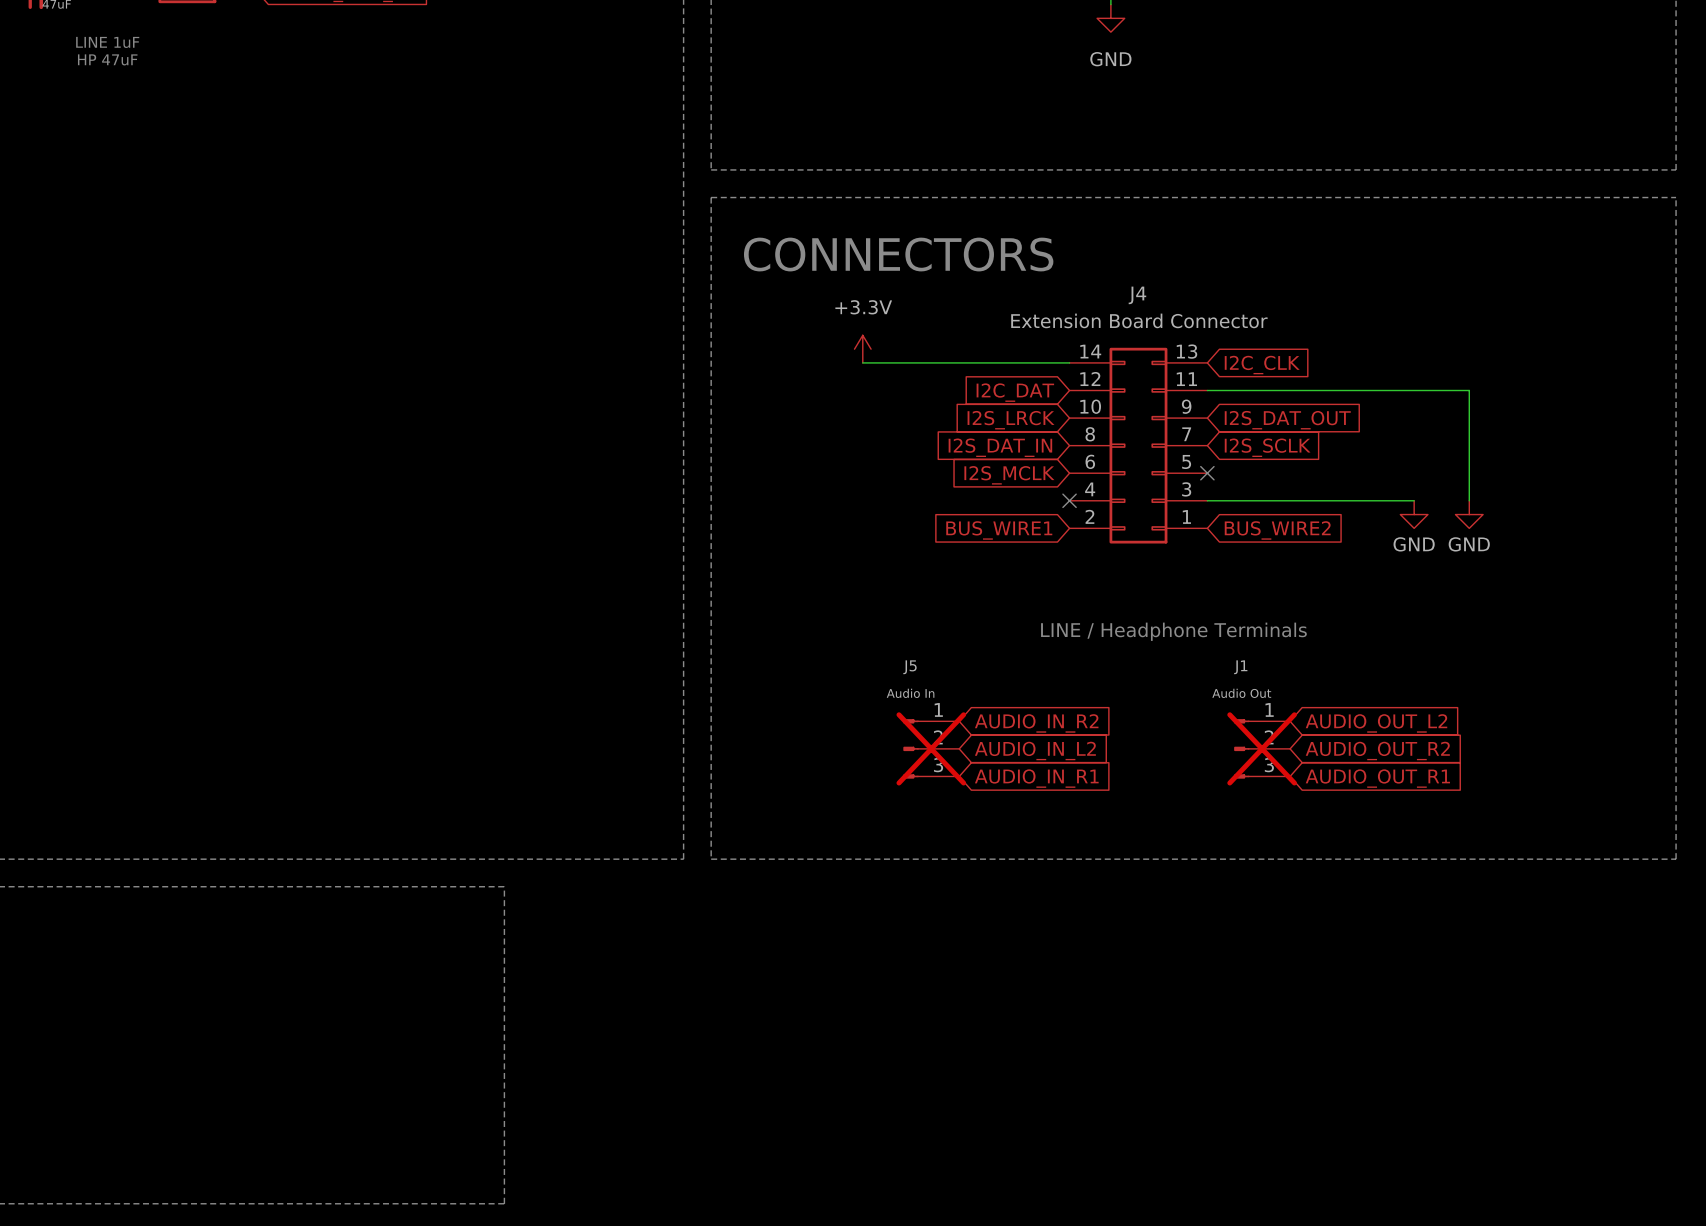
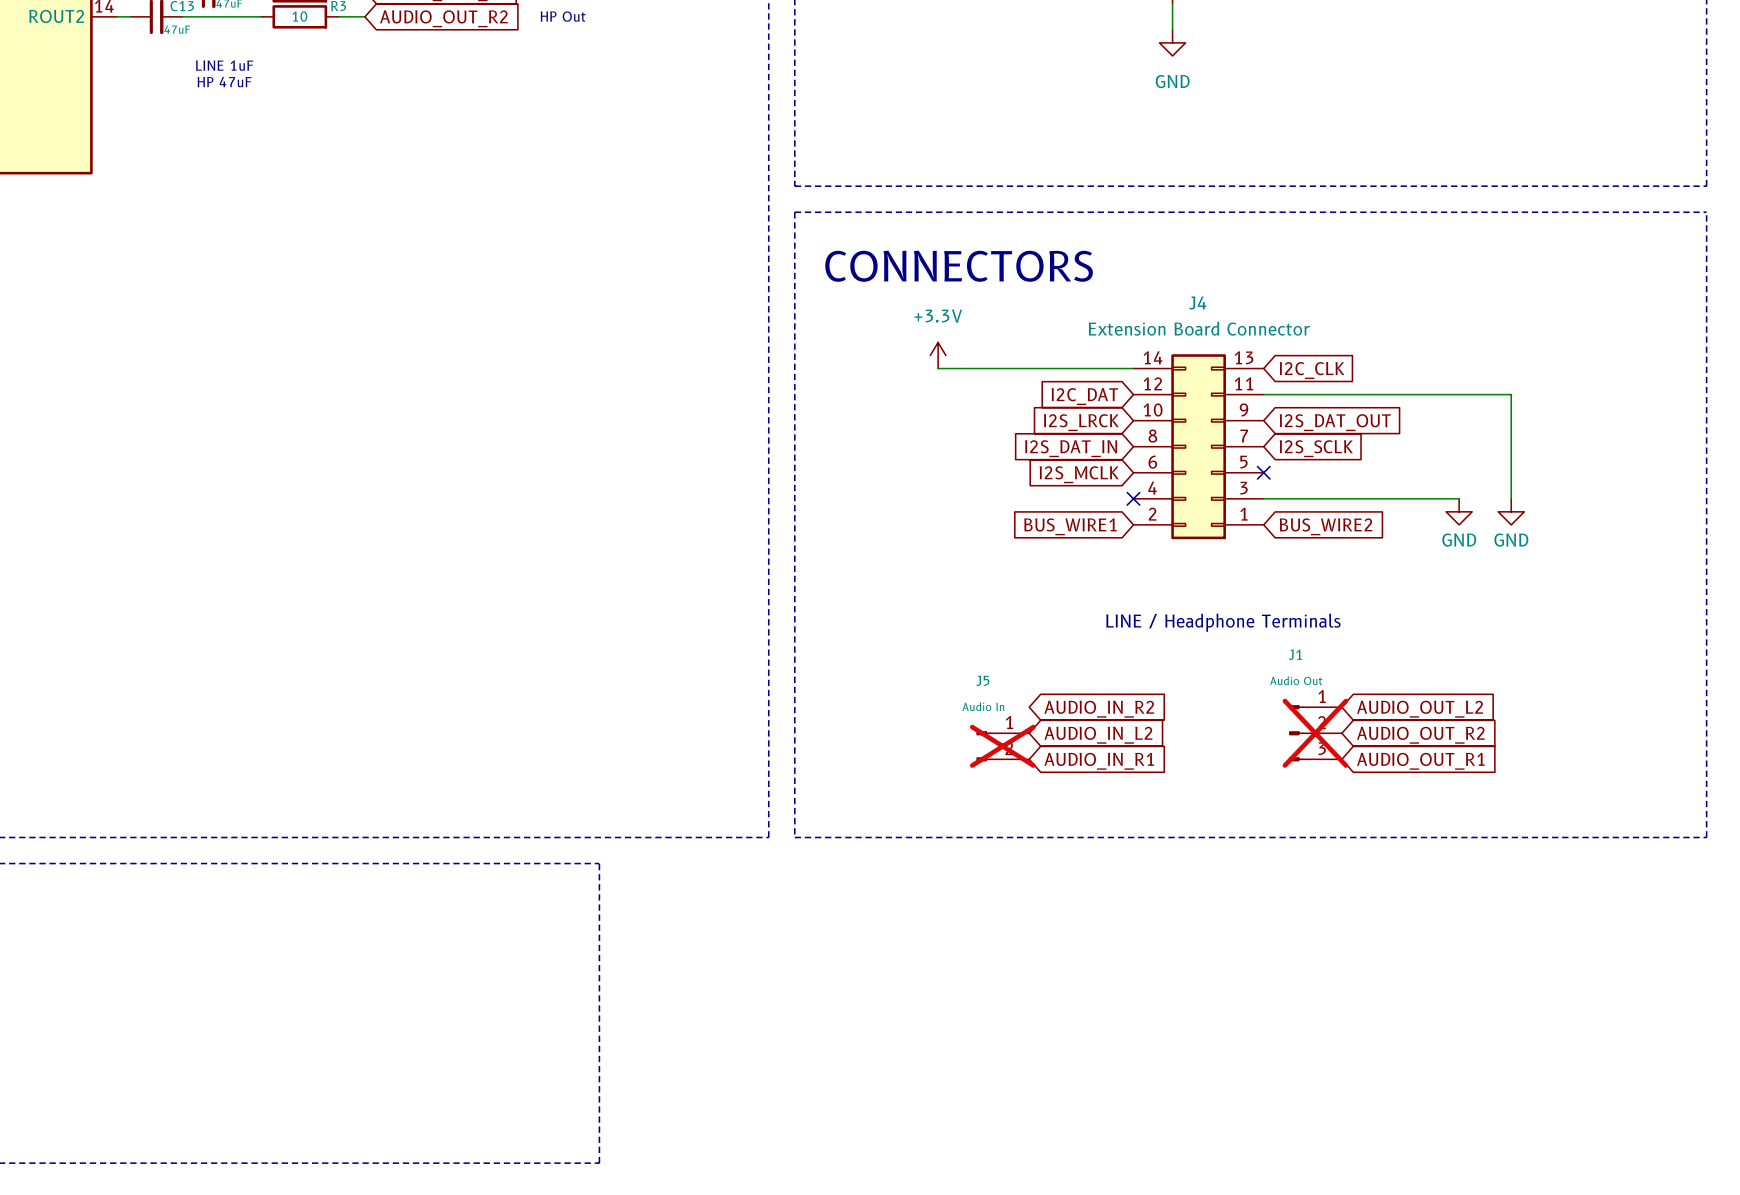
J5 symbol: [903, 719, 960, 779] -> [976, 731, 1030, 762]

